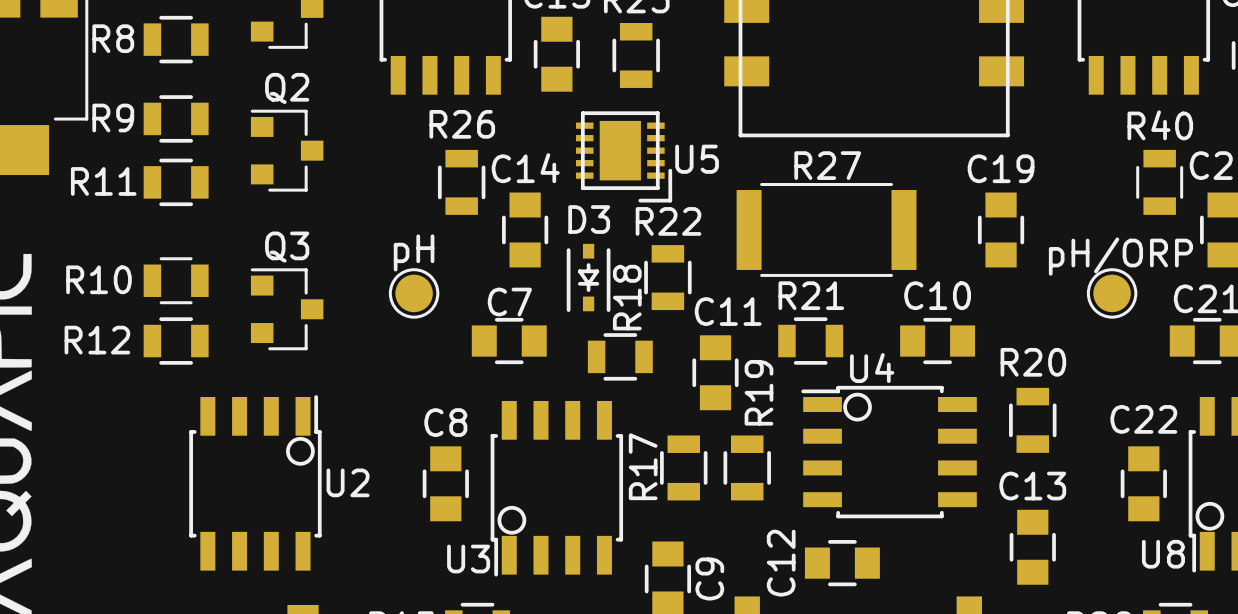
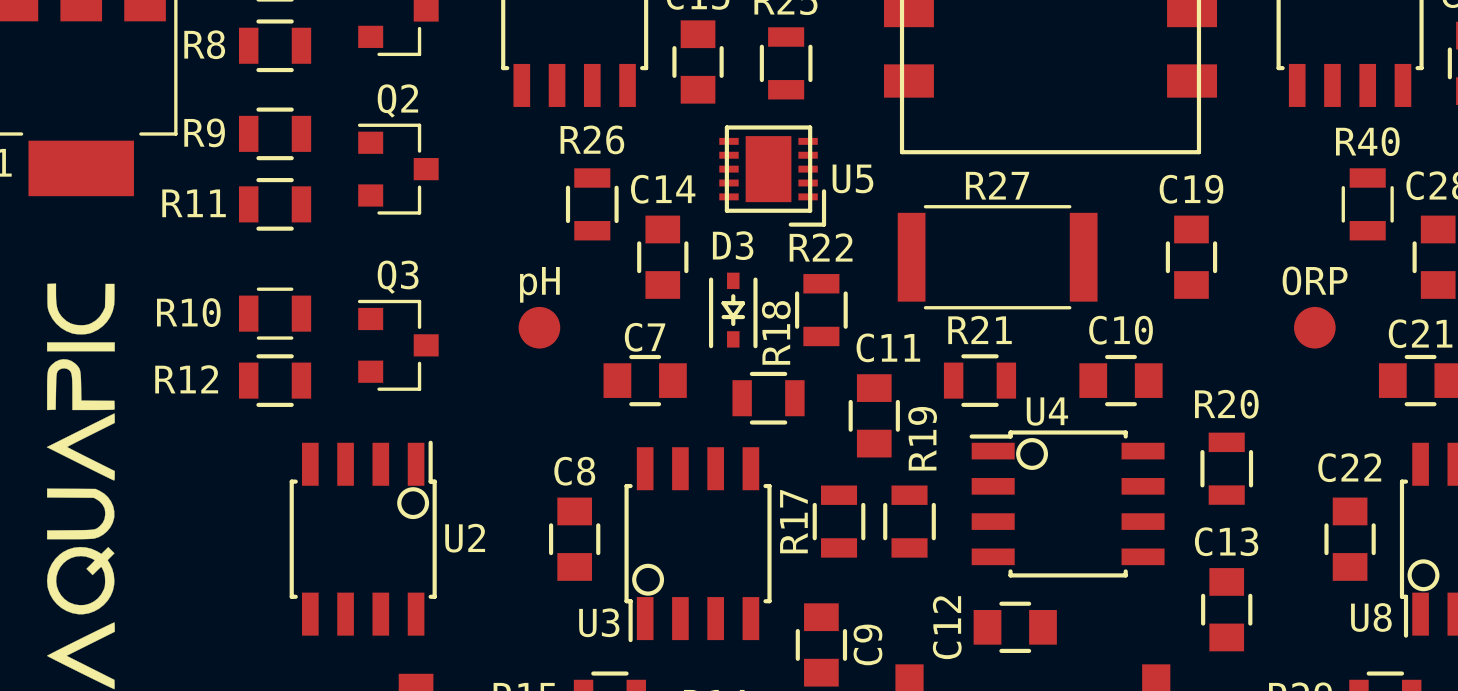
part: pH (414, 293) -> none
pH: none -> (539, 327)
part: pH/ORP (1112, 293) -> none
ORP: none -> (1314, 327)

